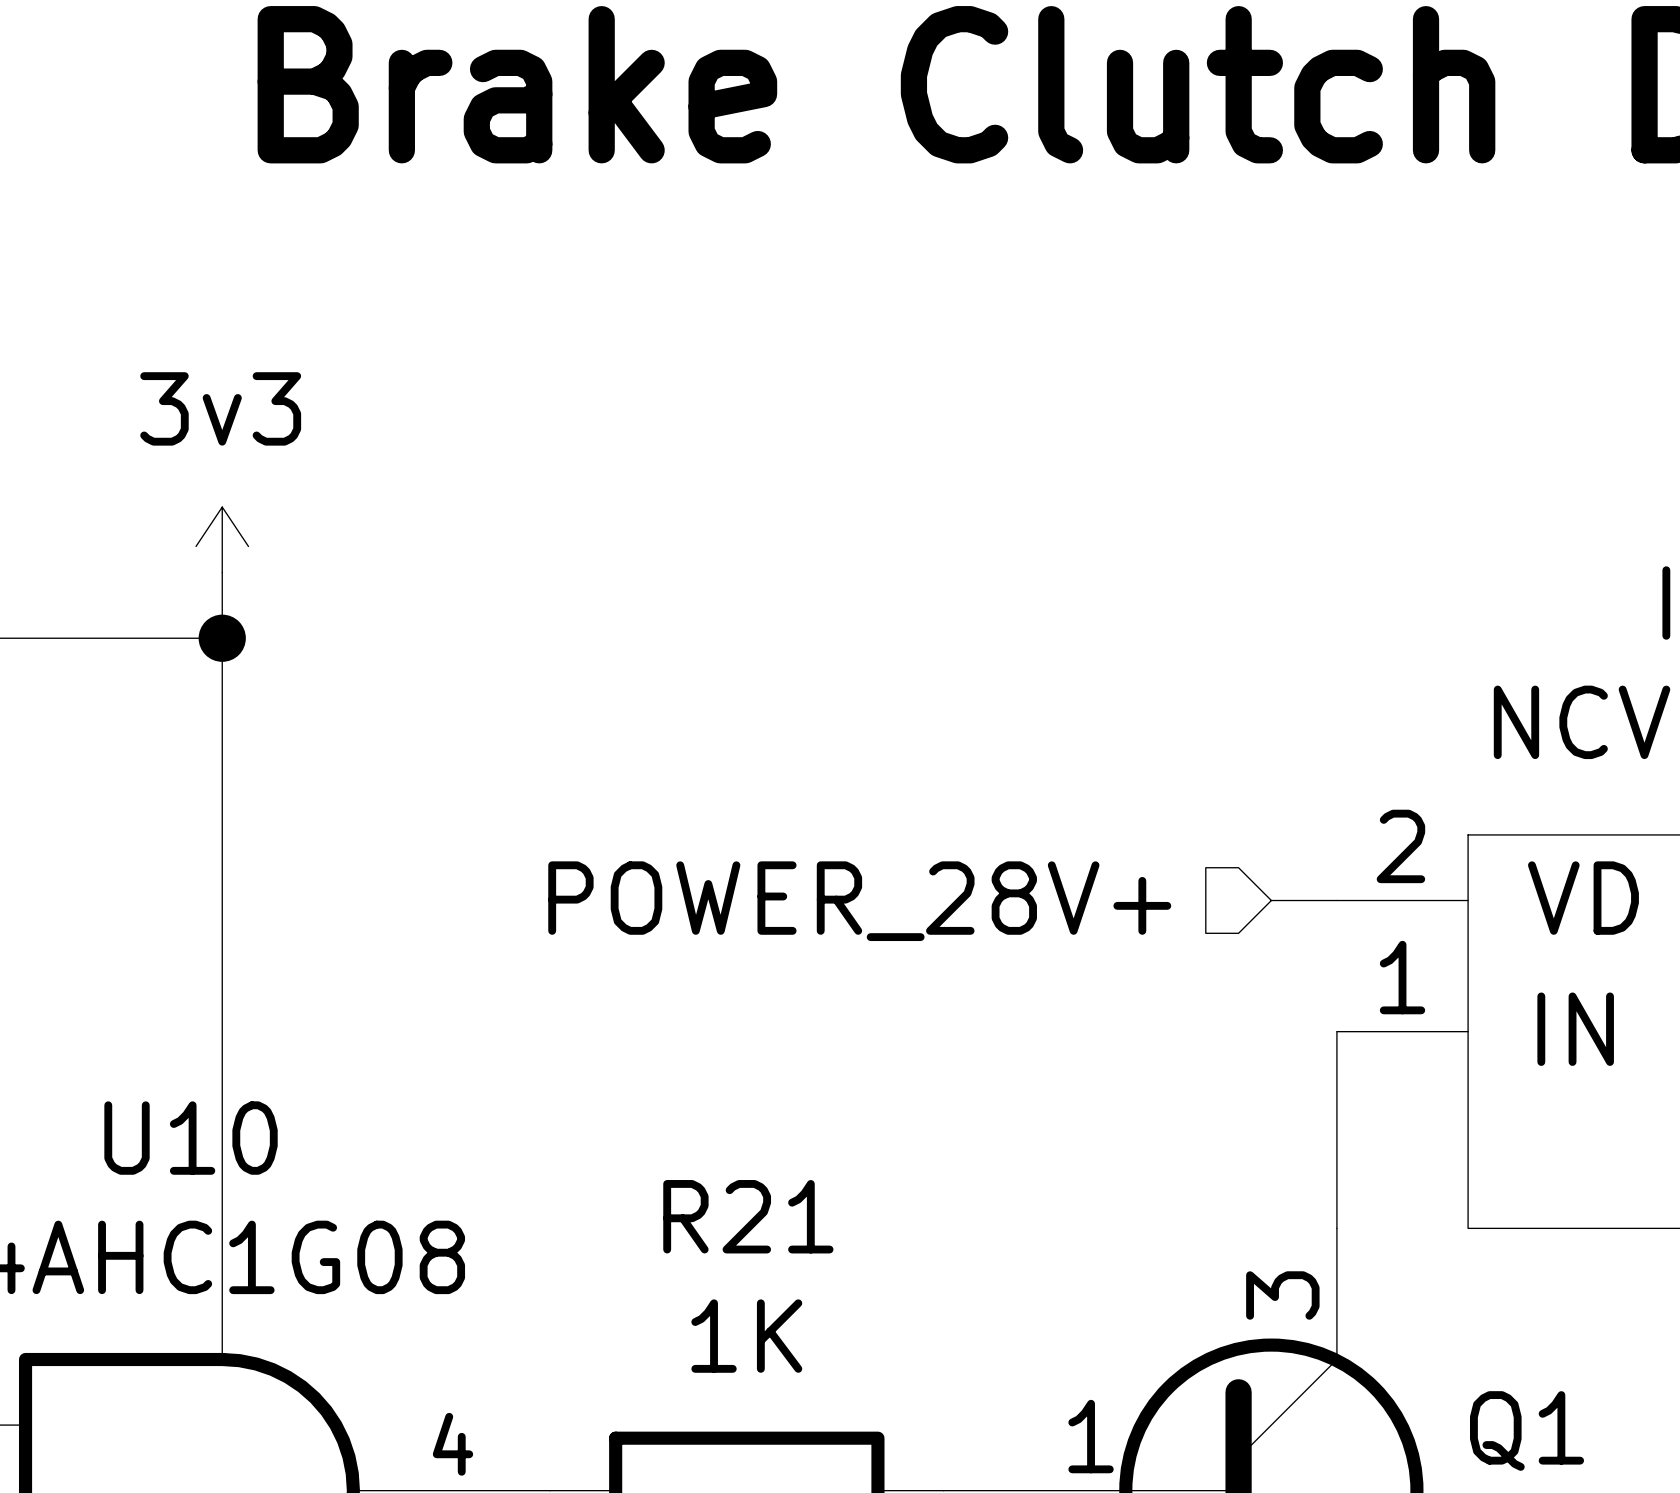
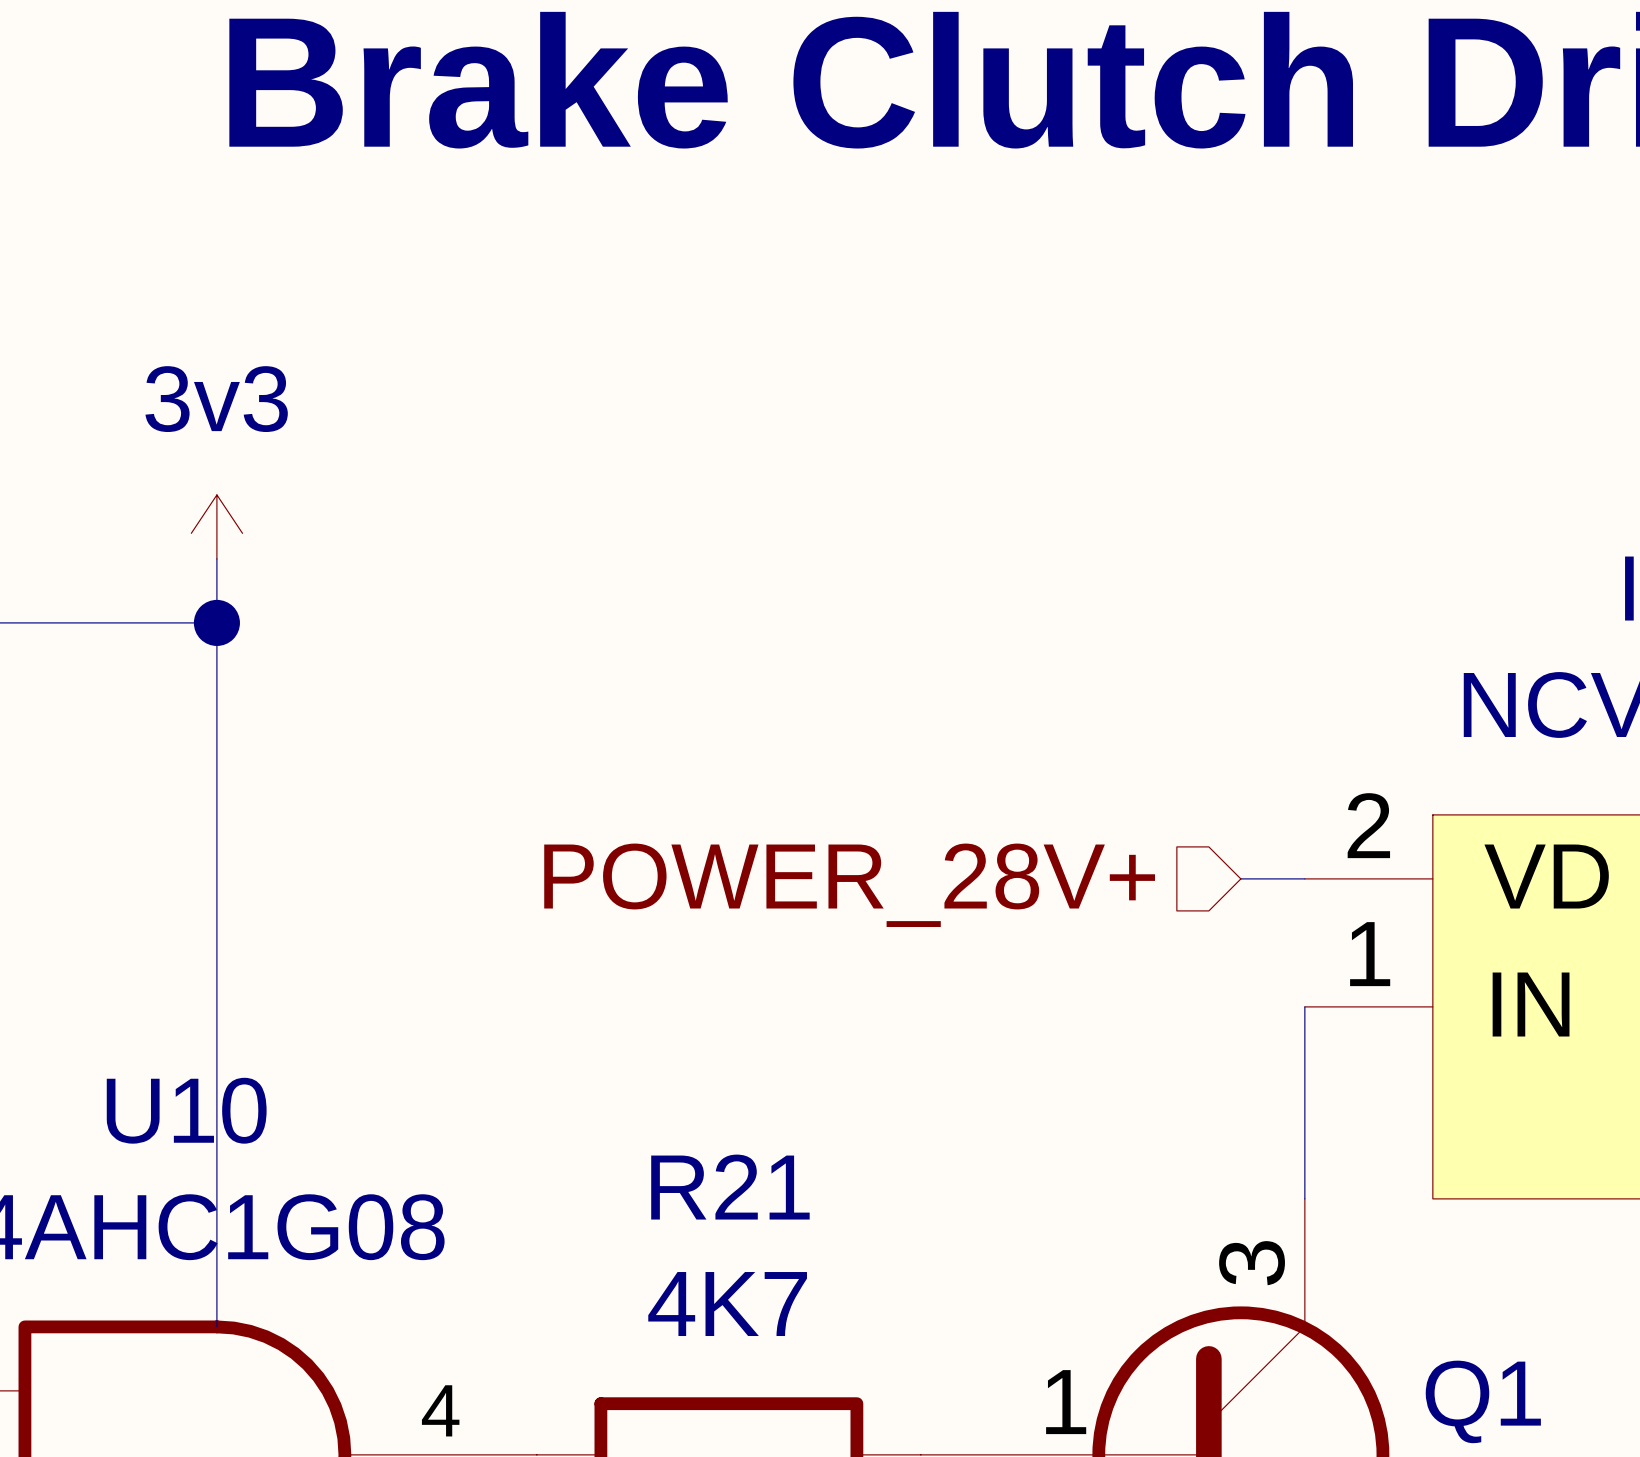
R21 value: 1K (746, 1336) -> 4K7 (727, 1304)

